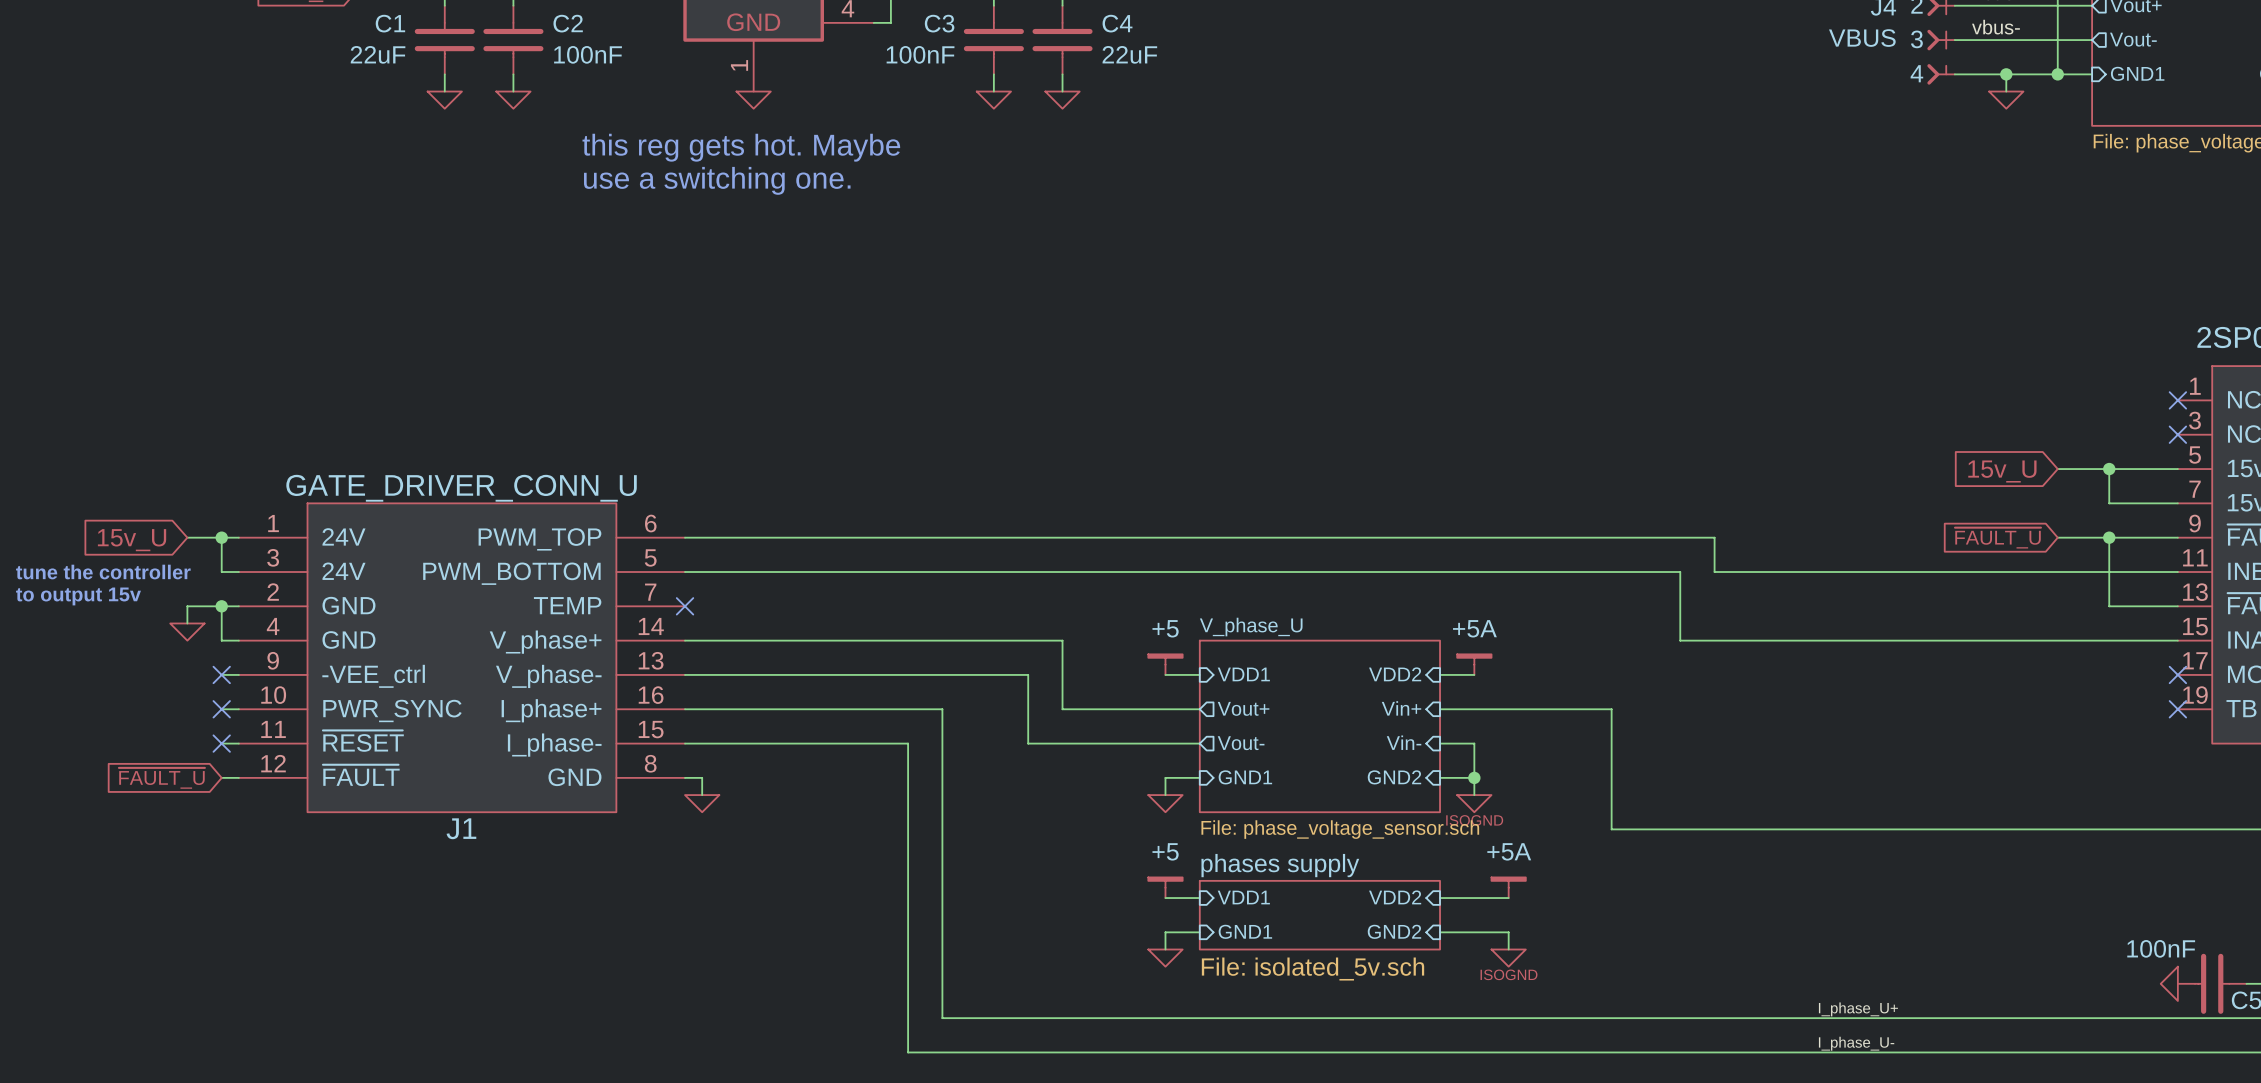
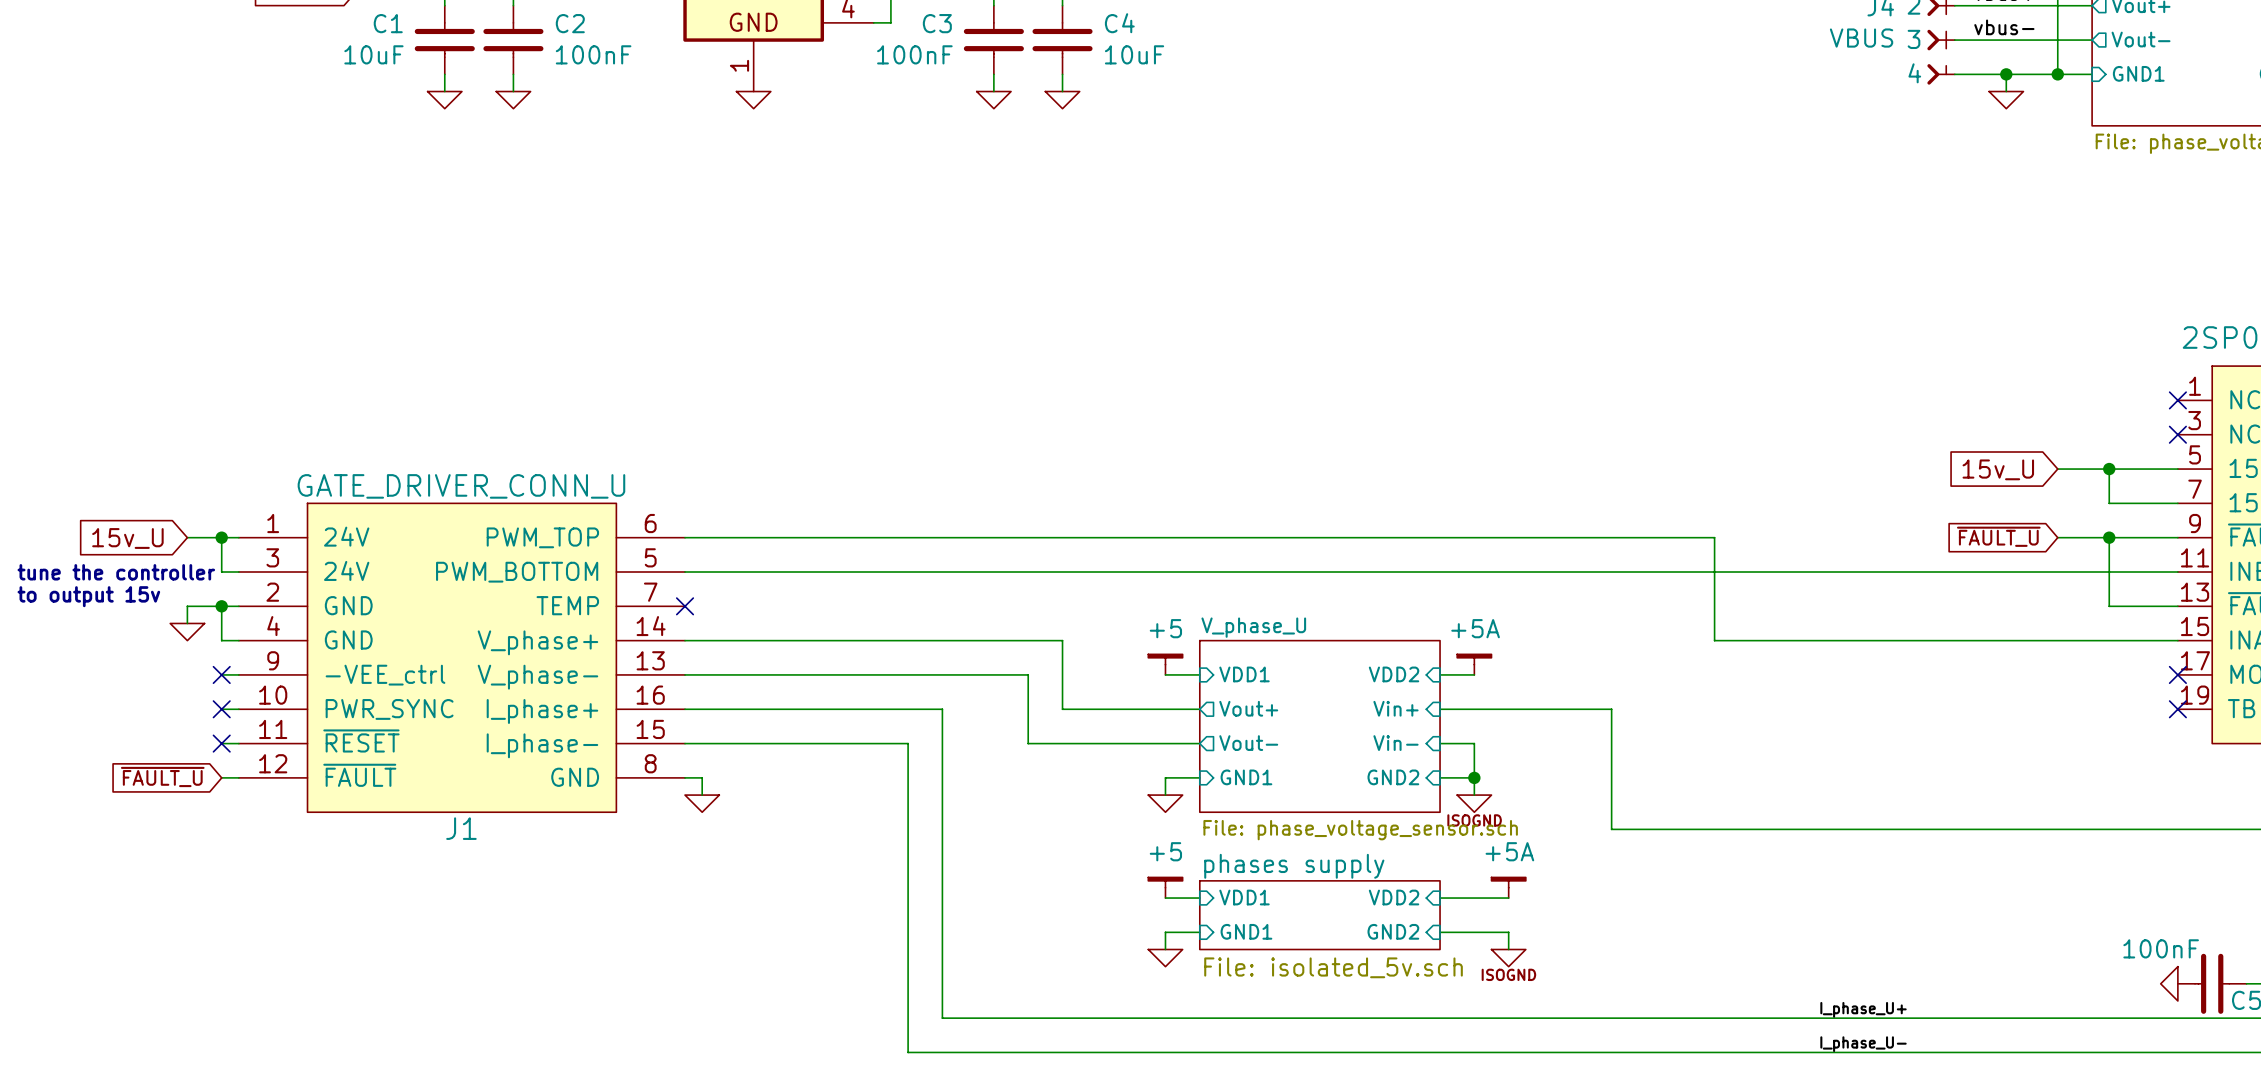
C1 value: 22uF (378, 54) -> 10uF (373, 54)
C4 value: 22uF (1129, 54) -> 10uF (1134, 54)
text: this reg gets hot. Maybe (741, 147) -> none
text: use a switching one. (717, 180) -> none
wire: (1680, 572) (1680, 640) (1714, 640) -> (1680, 572) (1714, 572) (1714, 640)

